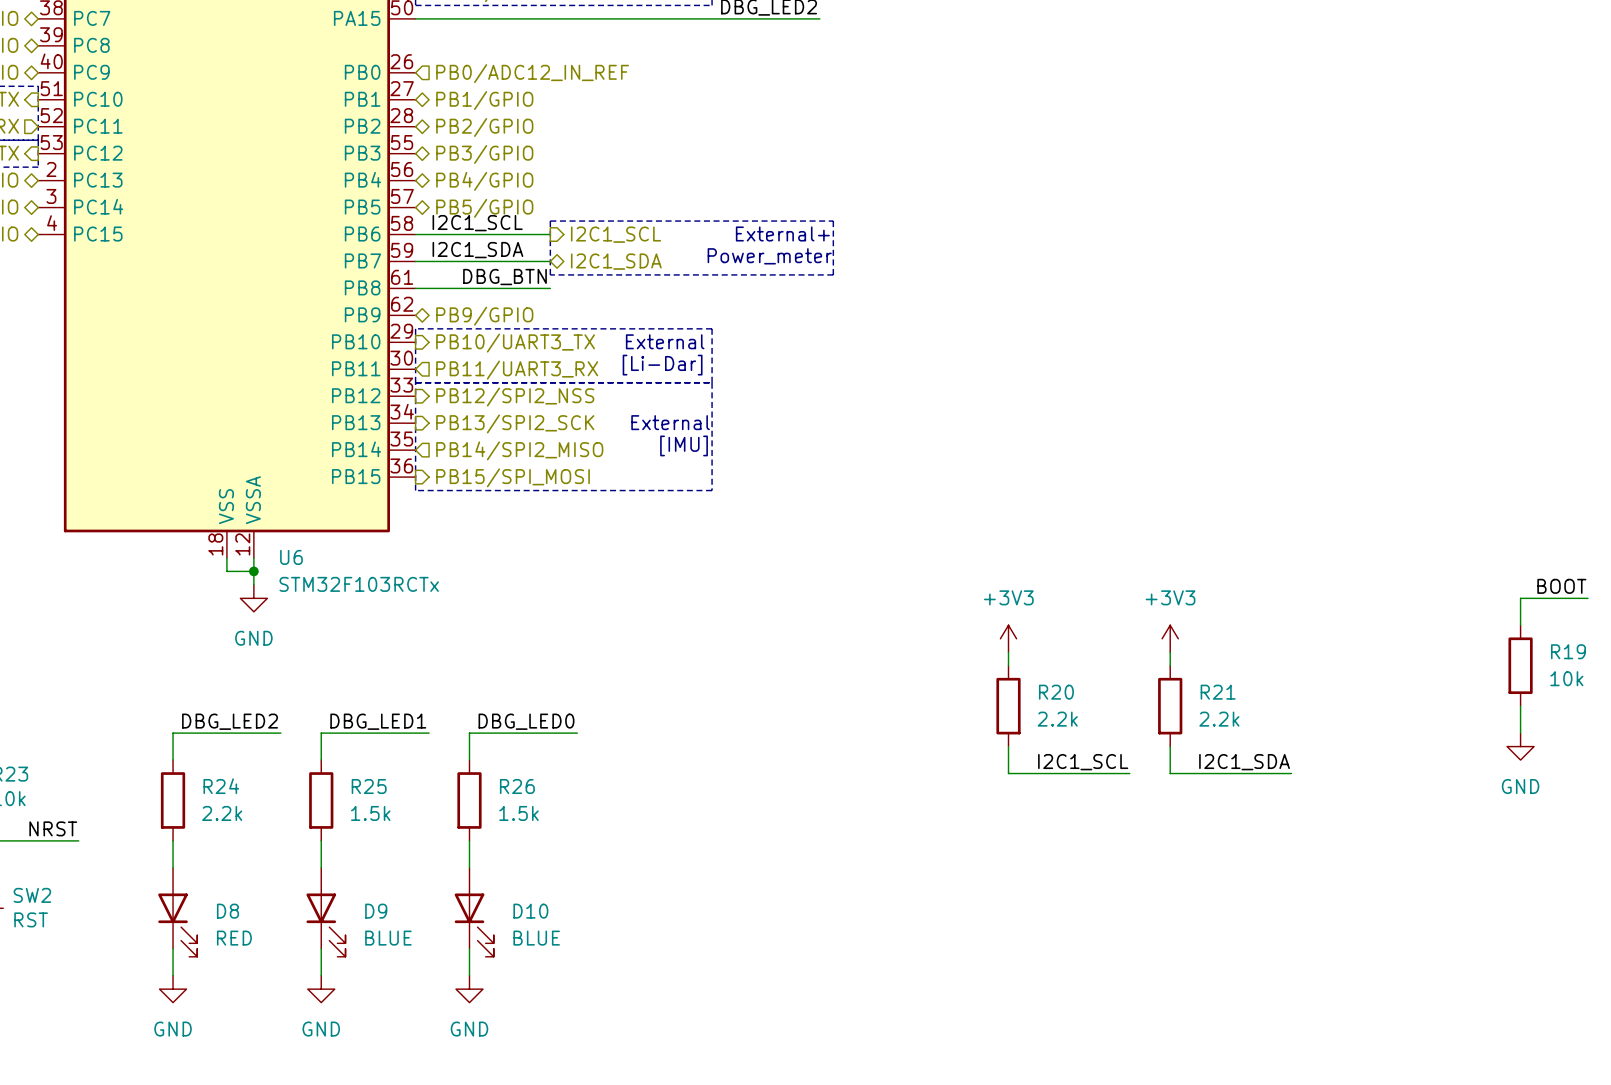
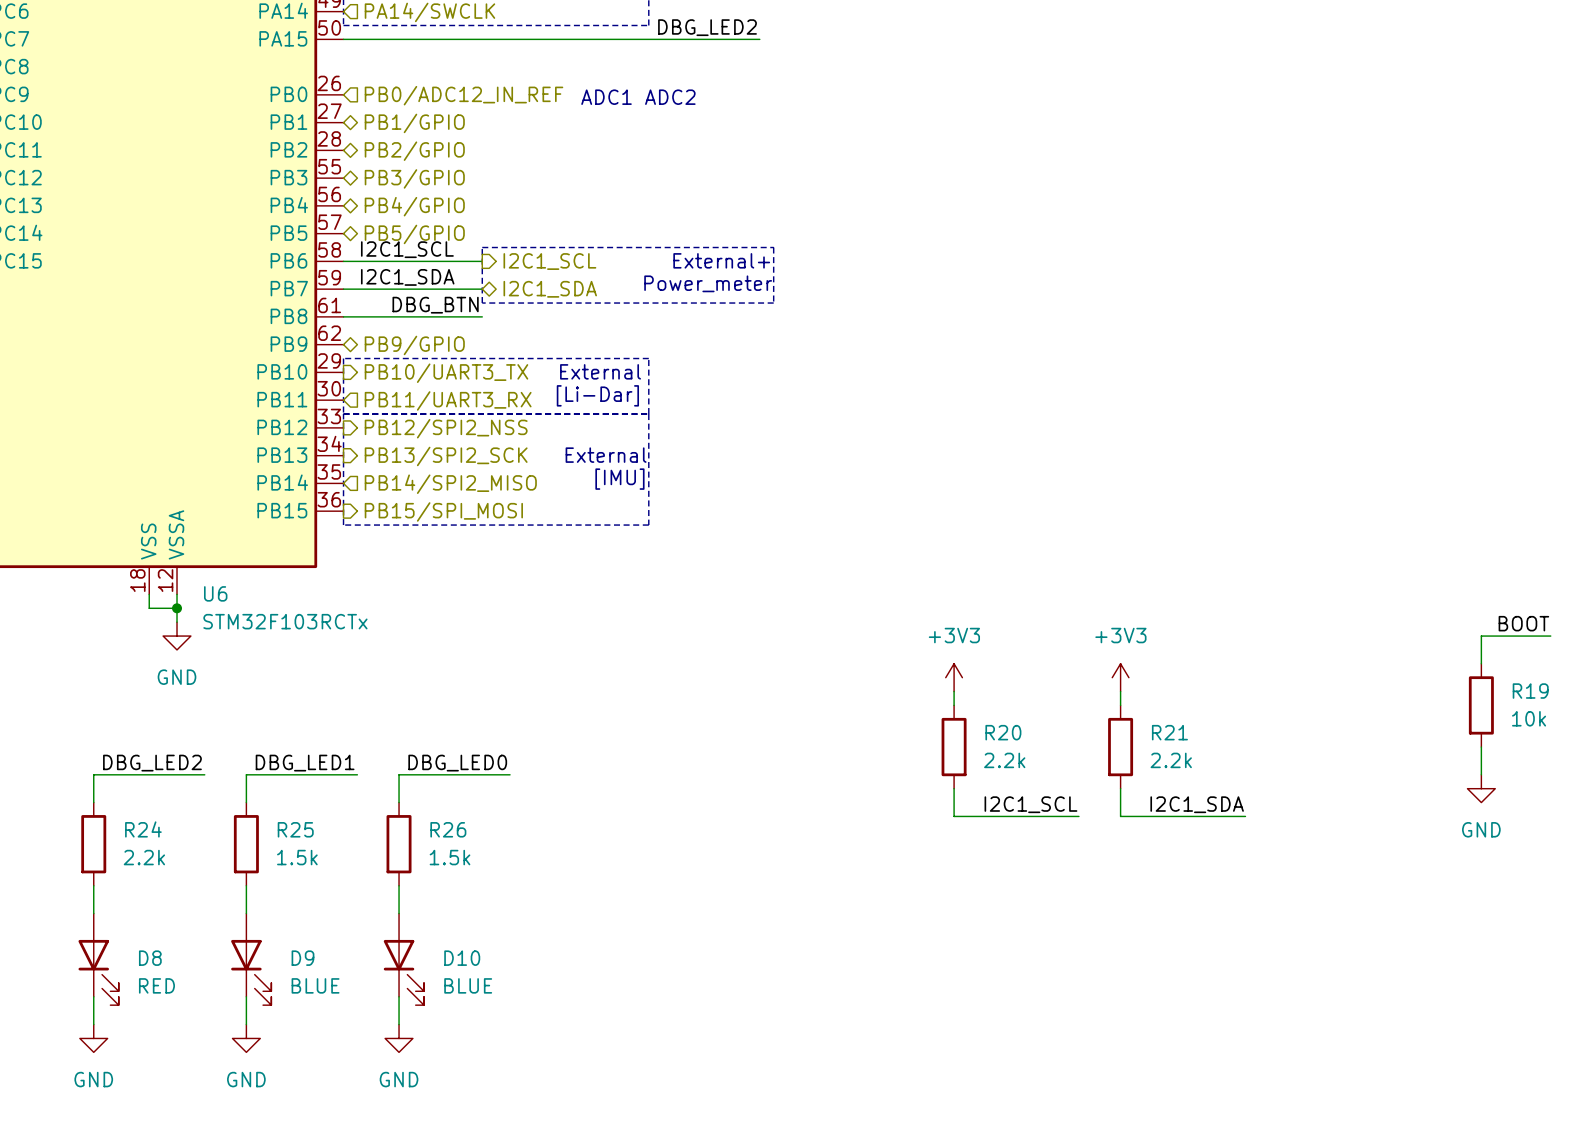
text: none -> ADC1 (606, 97)
text: none -> ADC2 (670, 97)

